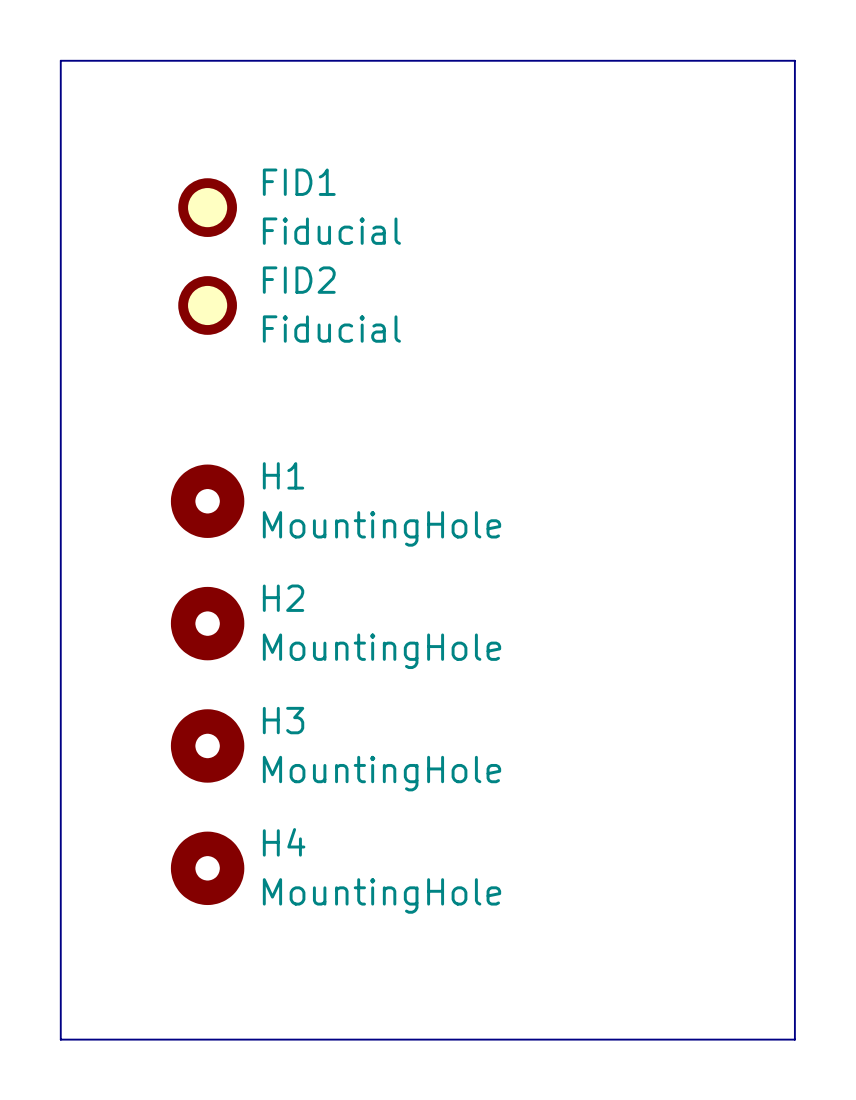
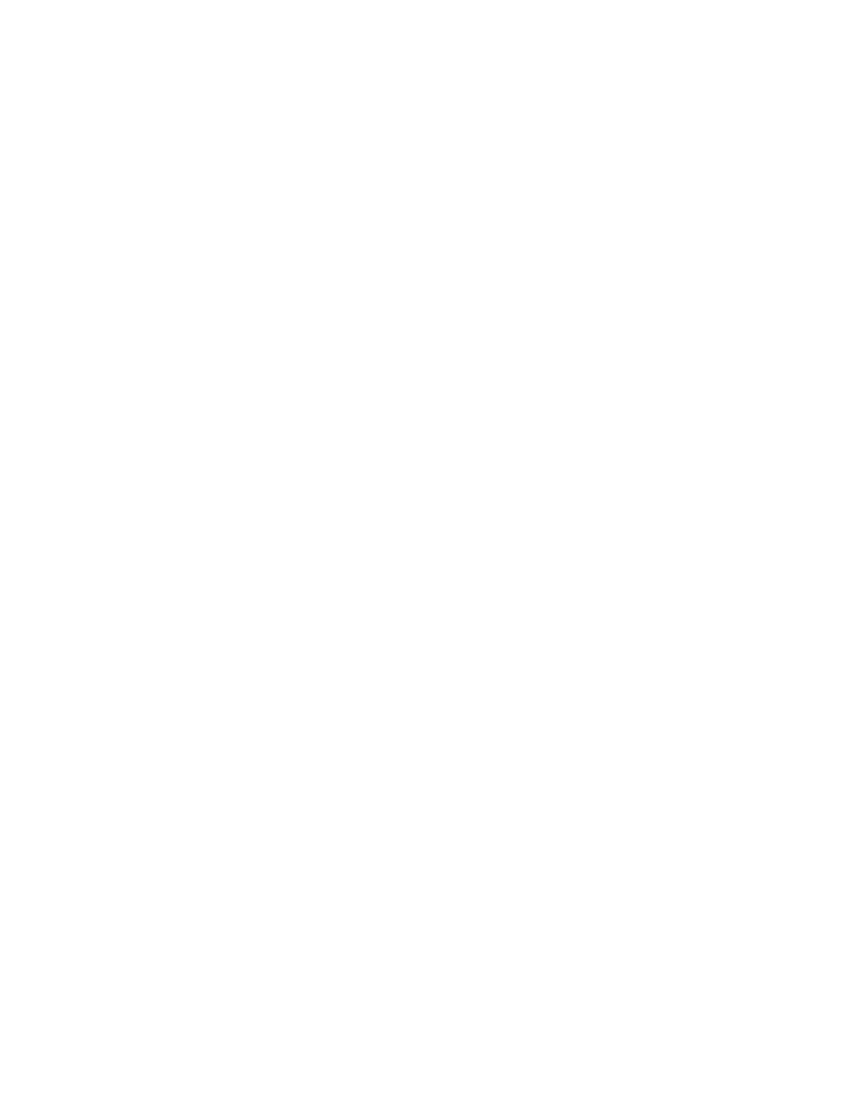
line: (60, 60) (794, 60) (794, 1039) (60, 1039) (60, 60) -> none
FID1: Fiducial (207, 207) -> none
FID2: Fiducial (207, 305) -> none
H1: MountingHole (207, 501) -> none
H2: MountingHole (207, 623) -> none
H3: MountingHole (207, 745) -> none
H4: MountingHole (207, 868) -> none

